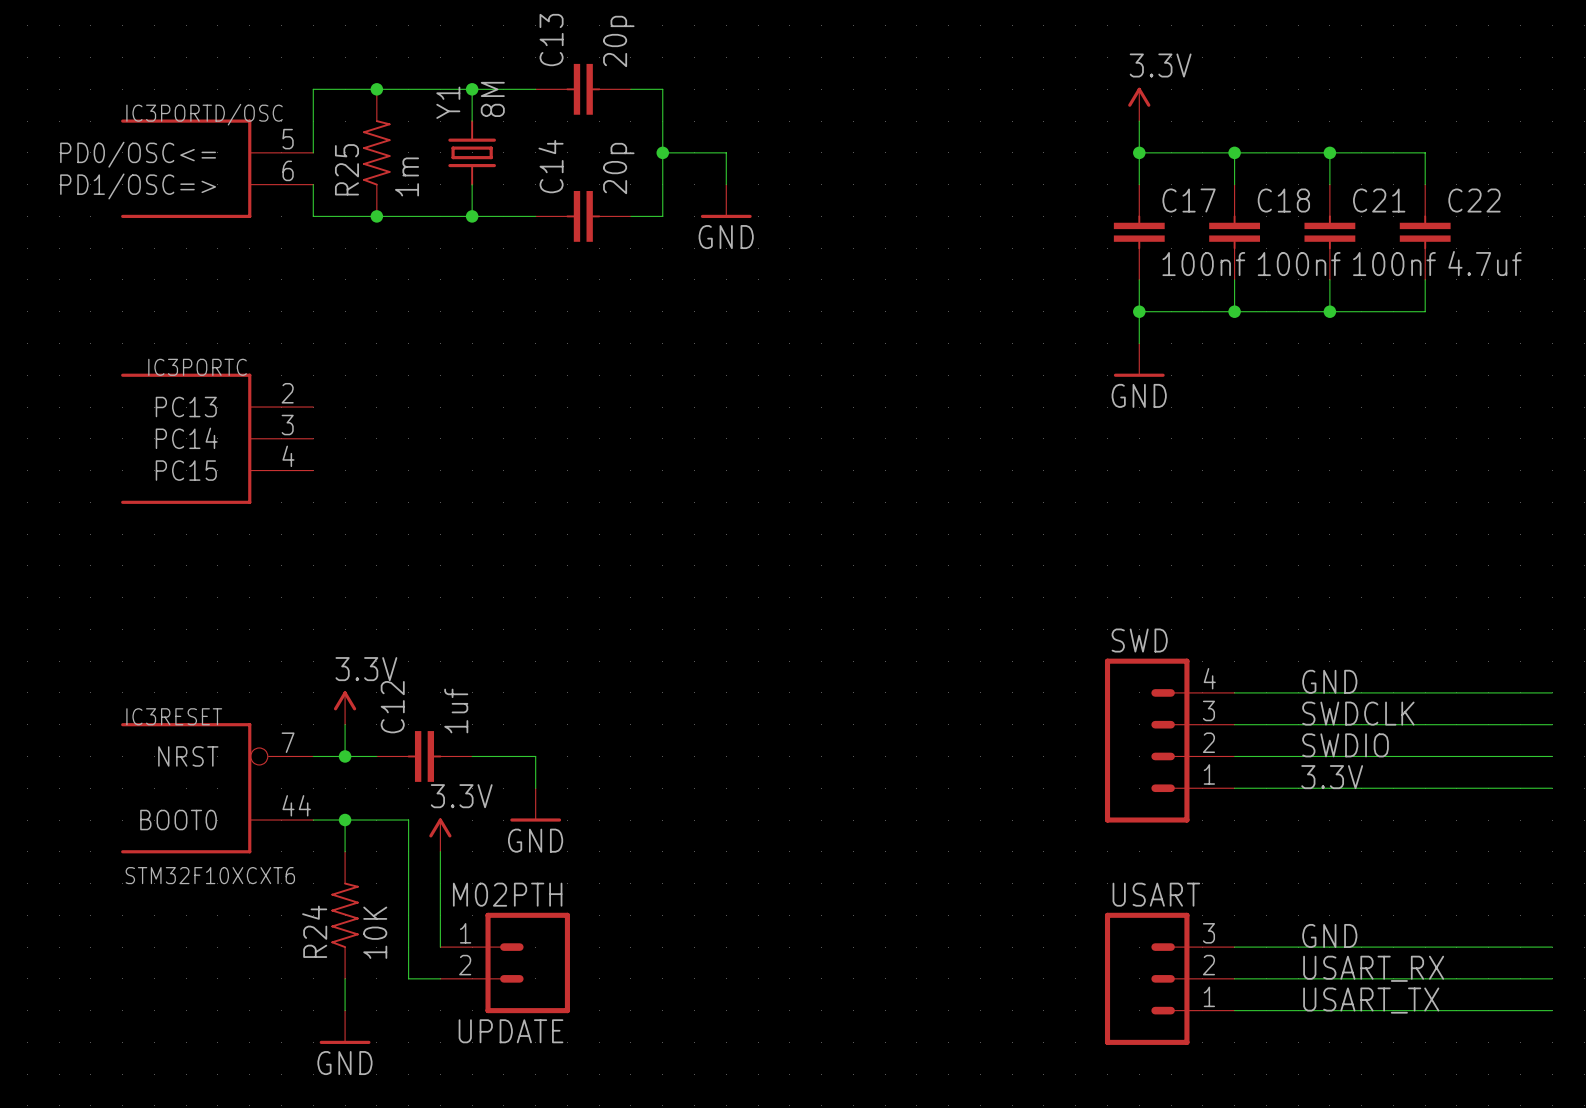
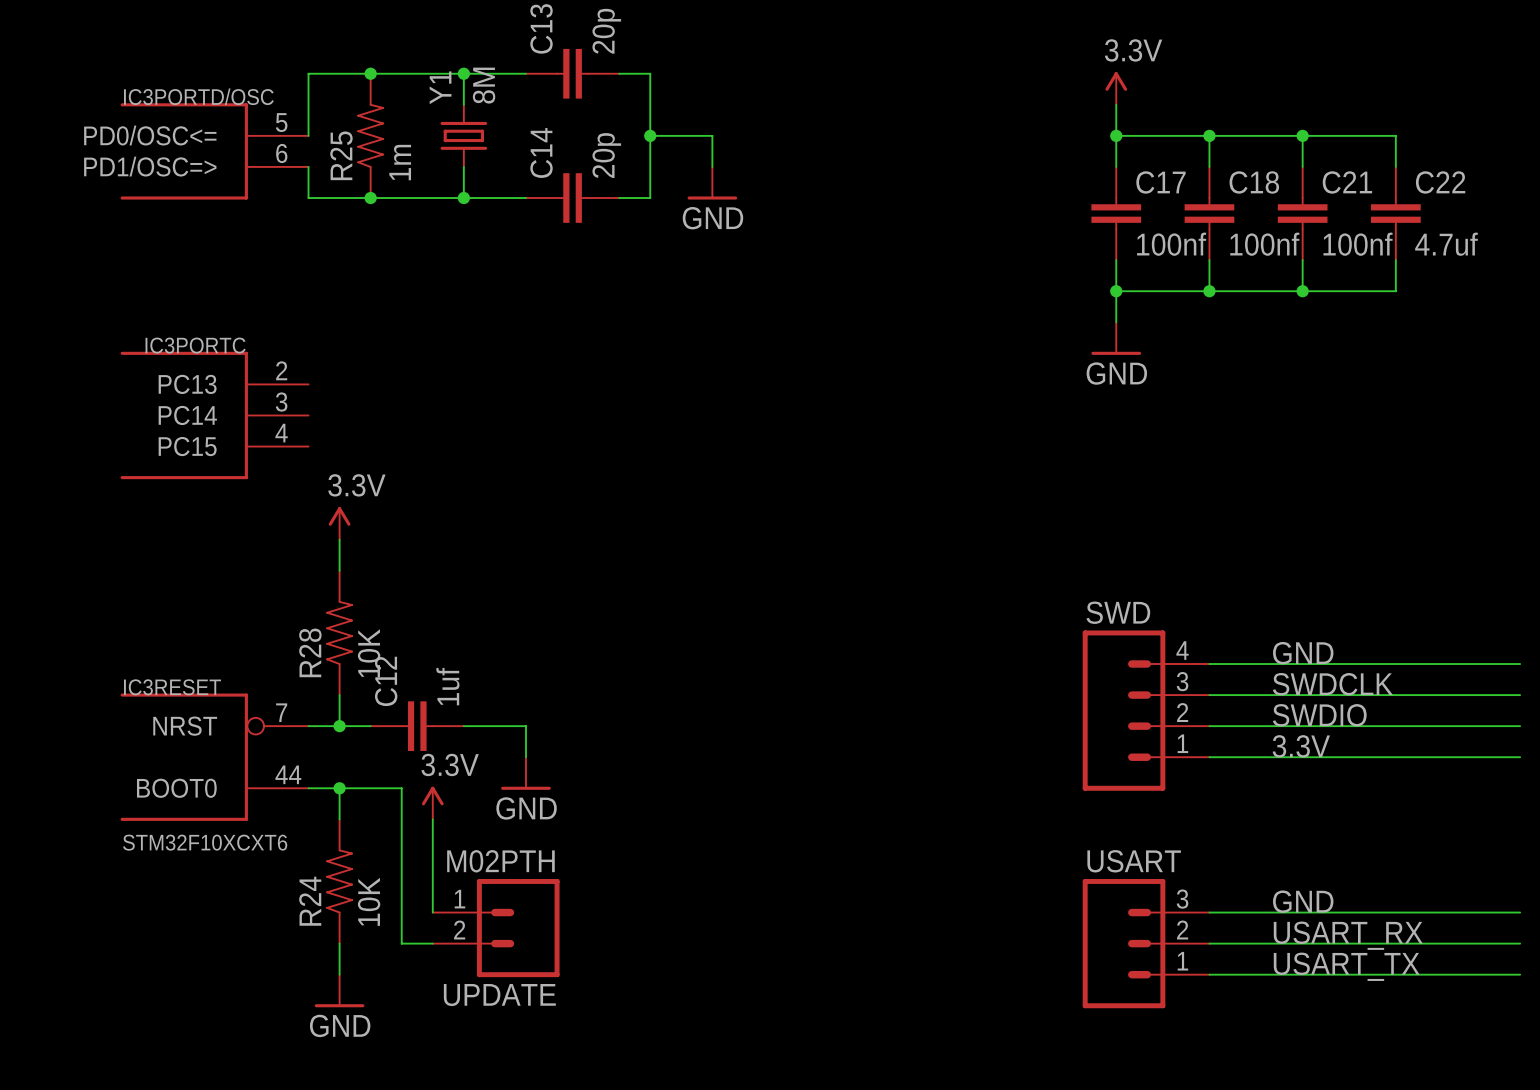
wire: none -> (339, 539) (339, 570)
R28: none -> 10K (339, 632)
power symbol position: 3.3V (345, 708) -> 3.3V (339, 523)

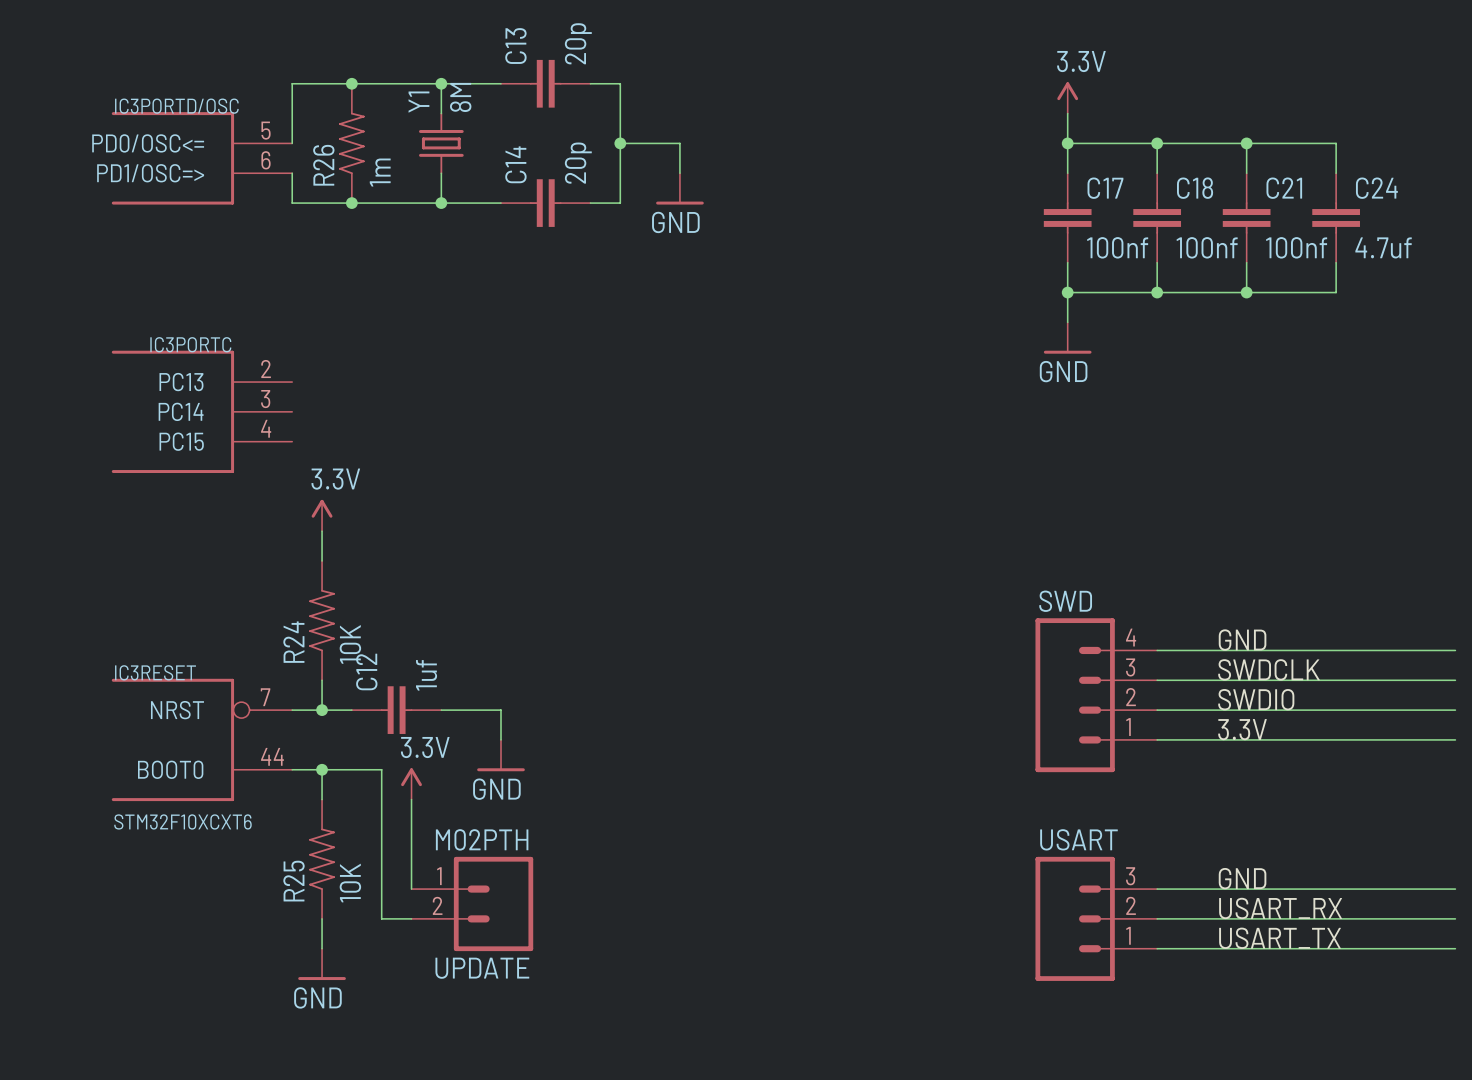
R25 name: R25 (341, 155) -> R26 (323, 165)
C22 name: C22 (1440, 182) -> C24 (1376, 188)
R28 name: R28 (310, 652) -> R24 (293, 642)
R24 name: R24 (310, 901) -> R25 (293, 881)

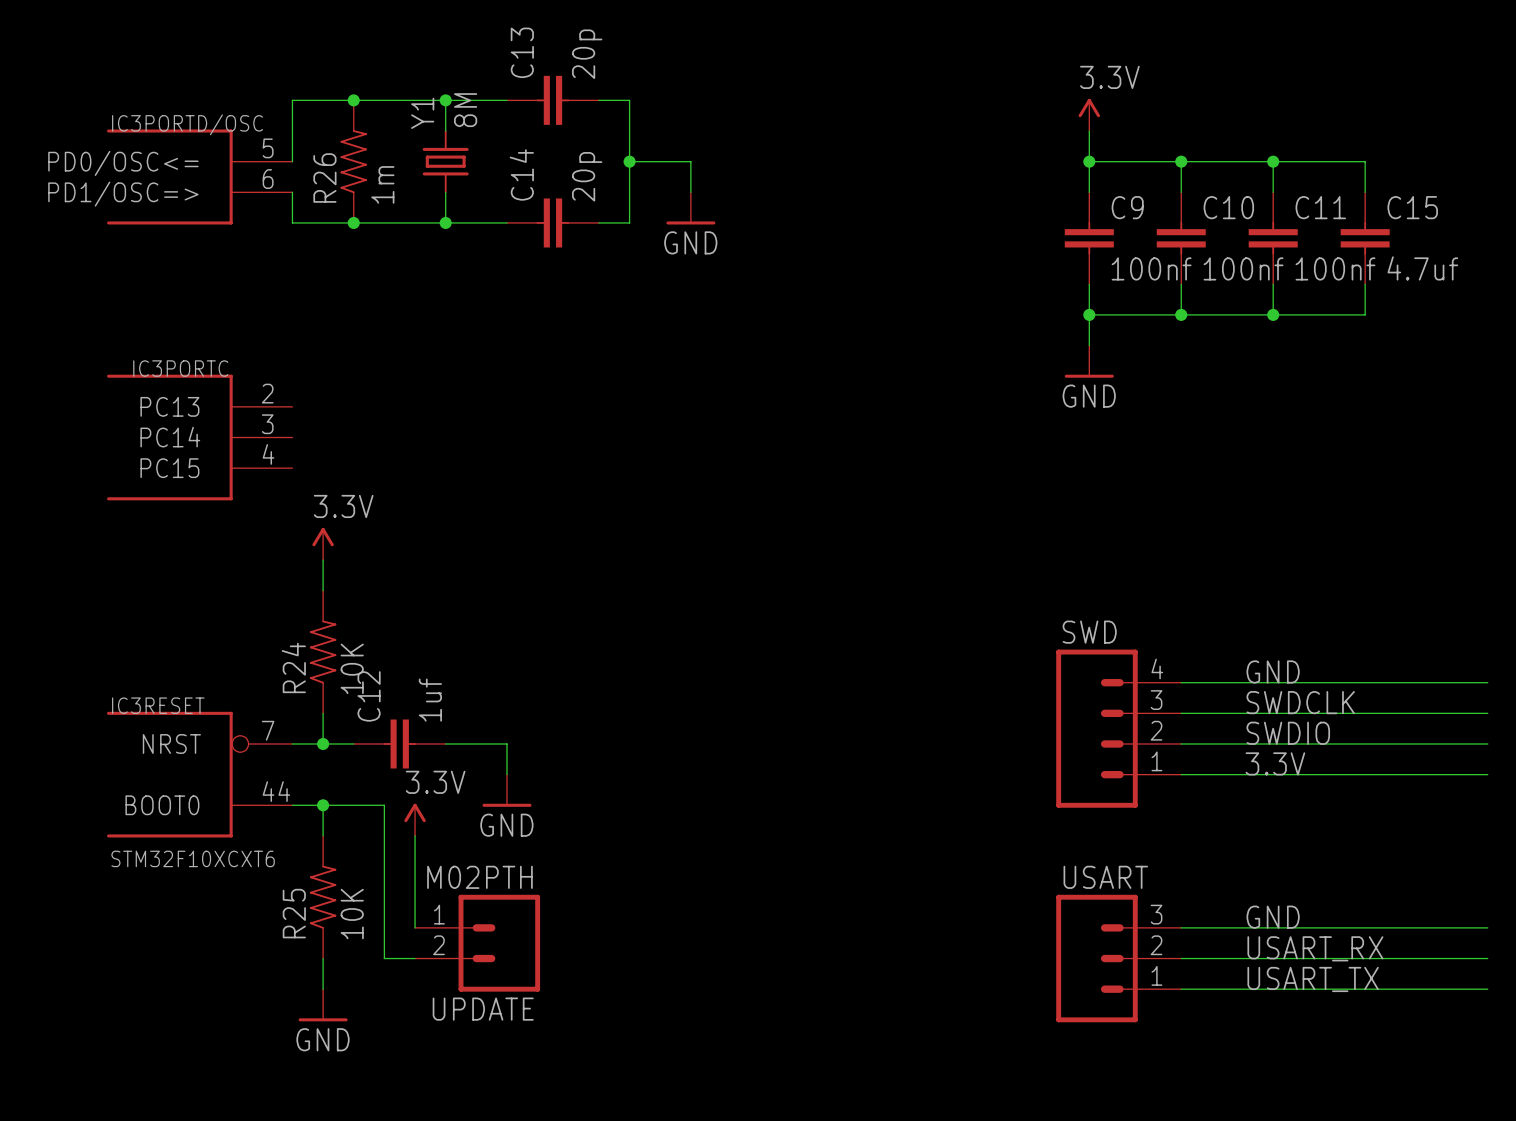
C17 name: C17 (1105, 188) -> C9 (1127, 207)
C18 name: C18 (1195, 188) -> C10 (1228, 207)
C21 name: C21 (1284, 188) -> C11 (1320, 207)
C24 name: C24 (1376, 188) -> C15 (1412, 207)

